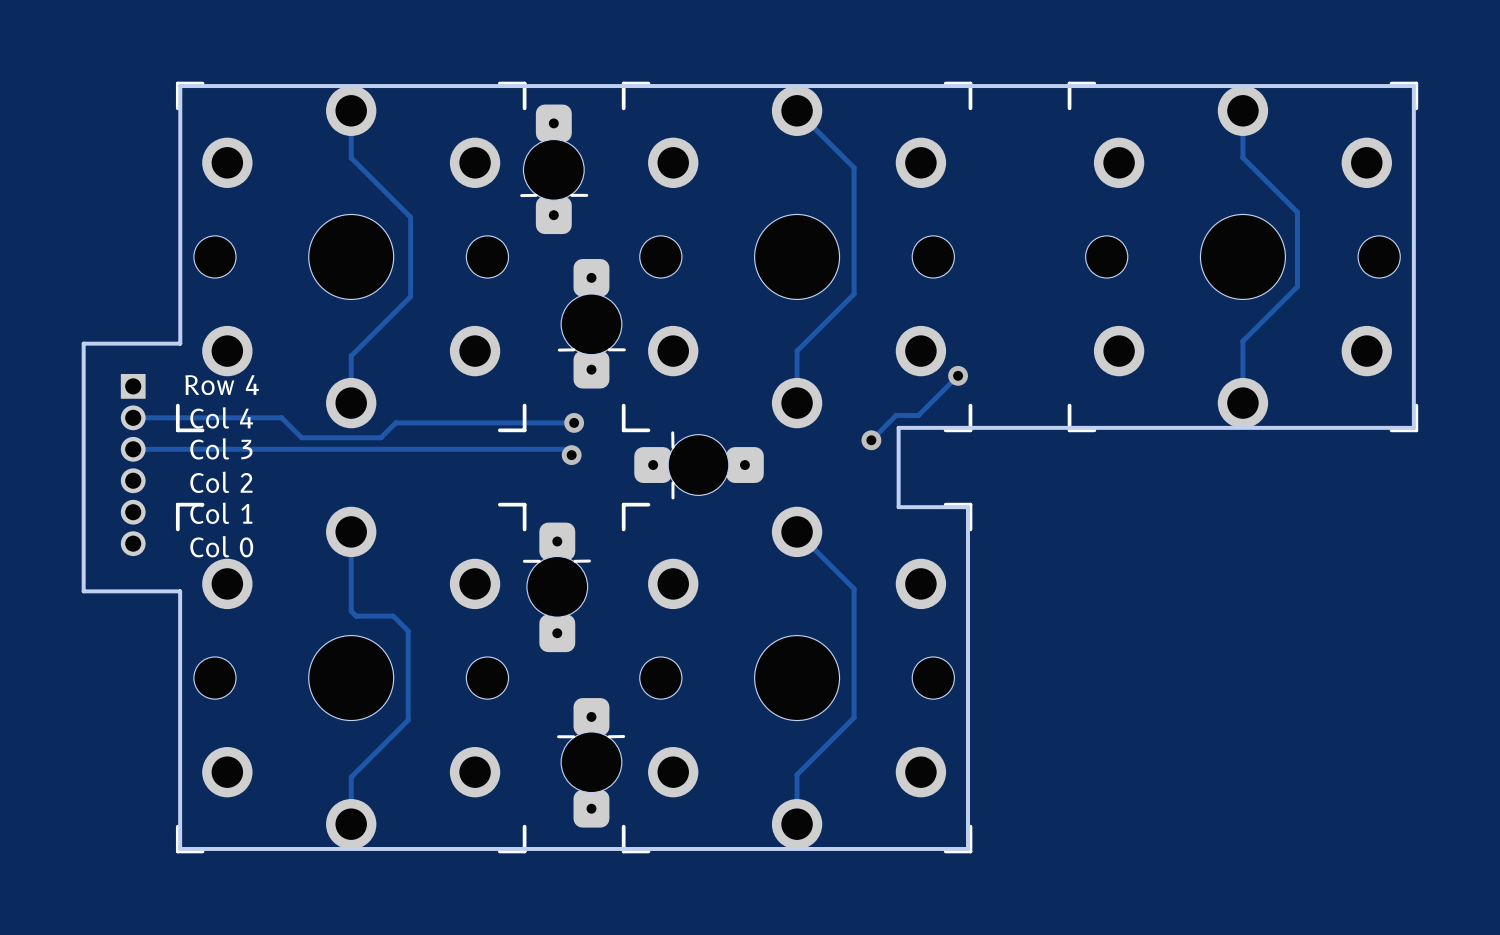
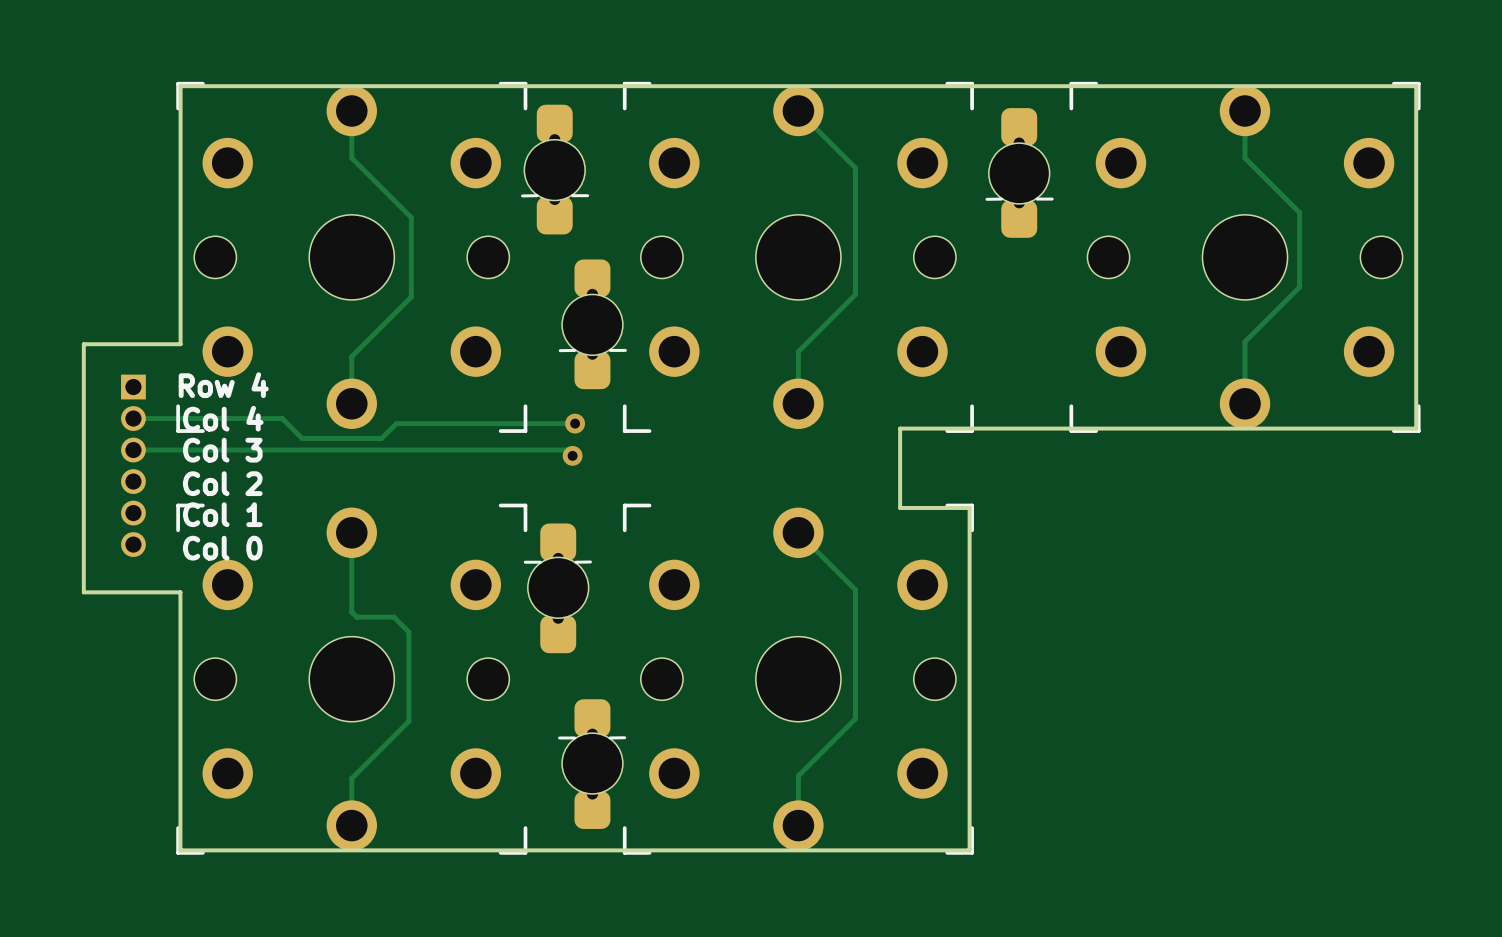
part footprint: [520, 104, 589, 235] -> [521, 104, 590, 235]
part: none -> (1019, 172)
part footprint: [557, 259, 626, 389] -> [558, 259, 627, 390]
track: (958, 375) (918, 415) (896, 415) (871, 440) -> none
via: (958, 375) -> none
via: (871, 440) -> none
part: (699, 465) -> none
part footprint: [522, 522, 591, 653] -> [523, 523, 592, 654]
part footprint: [557, 698, 626, 828] -> [557, 699, 627, 829]

